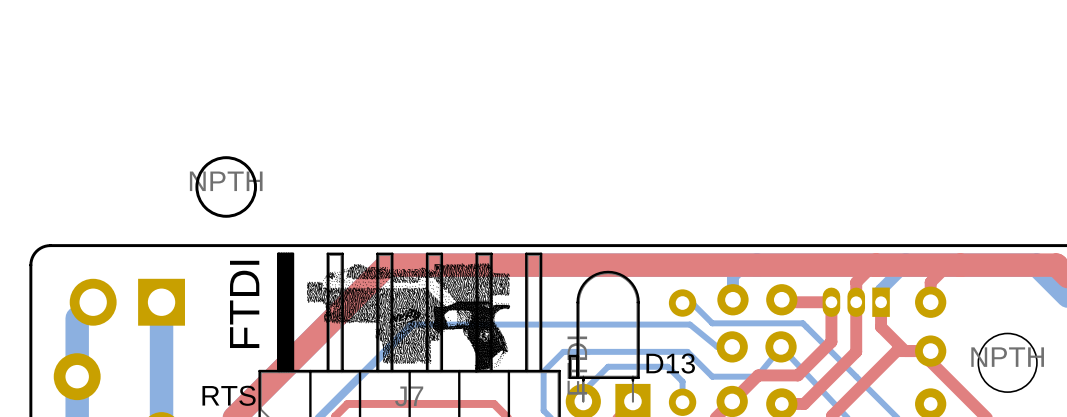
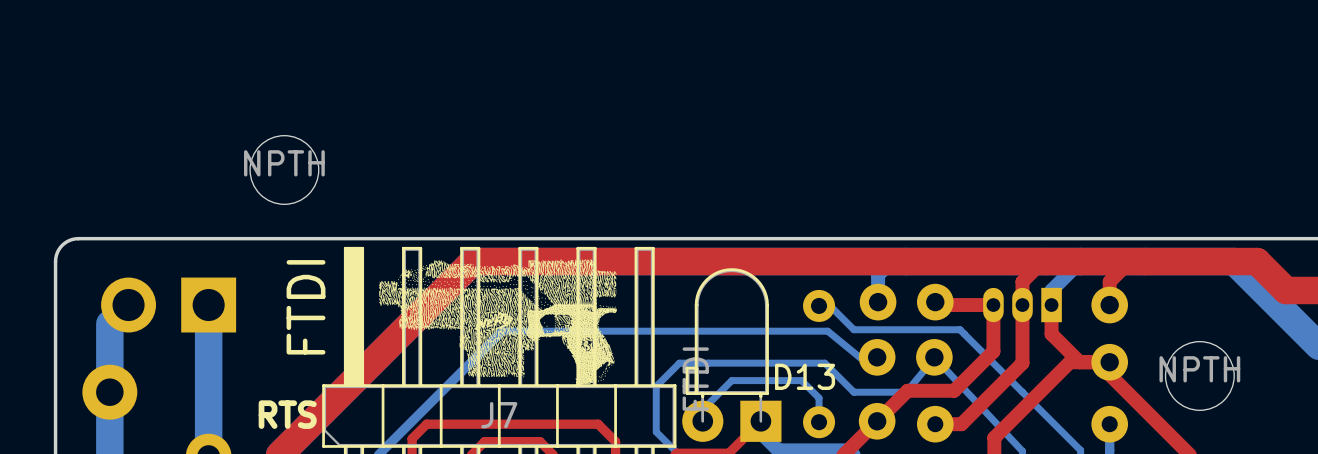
round board edge: [195, 156, 257, 218] -> none

